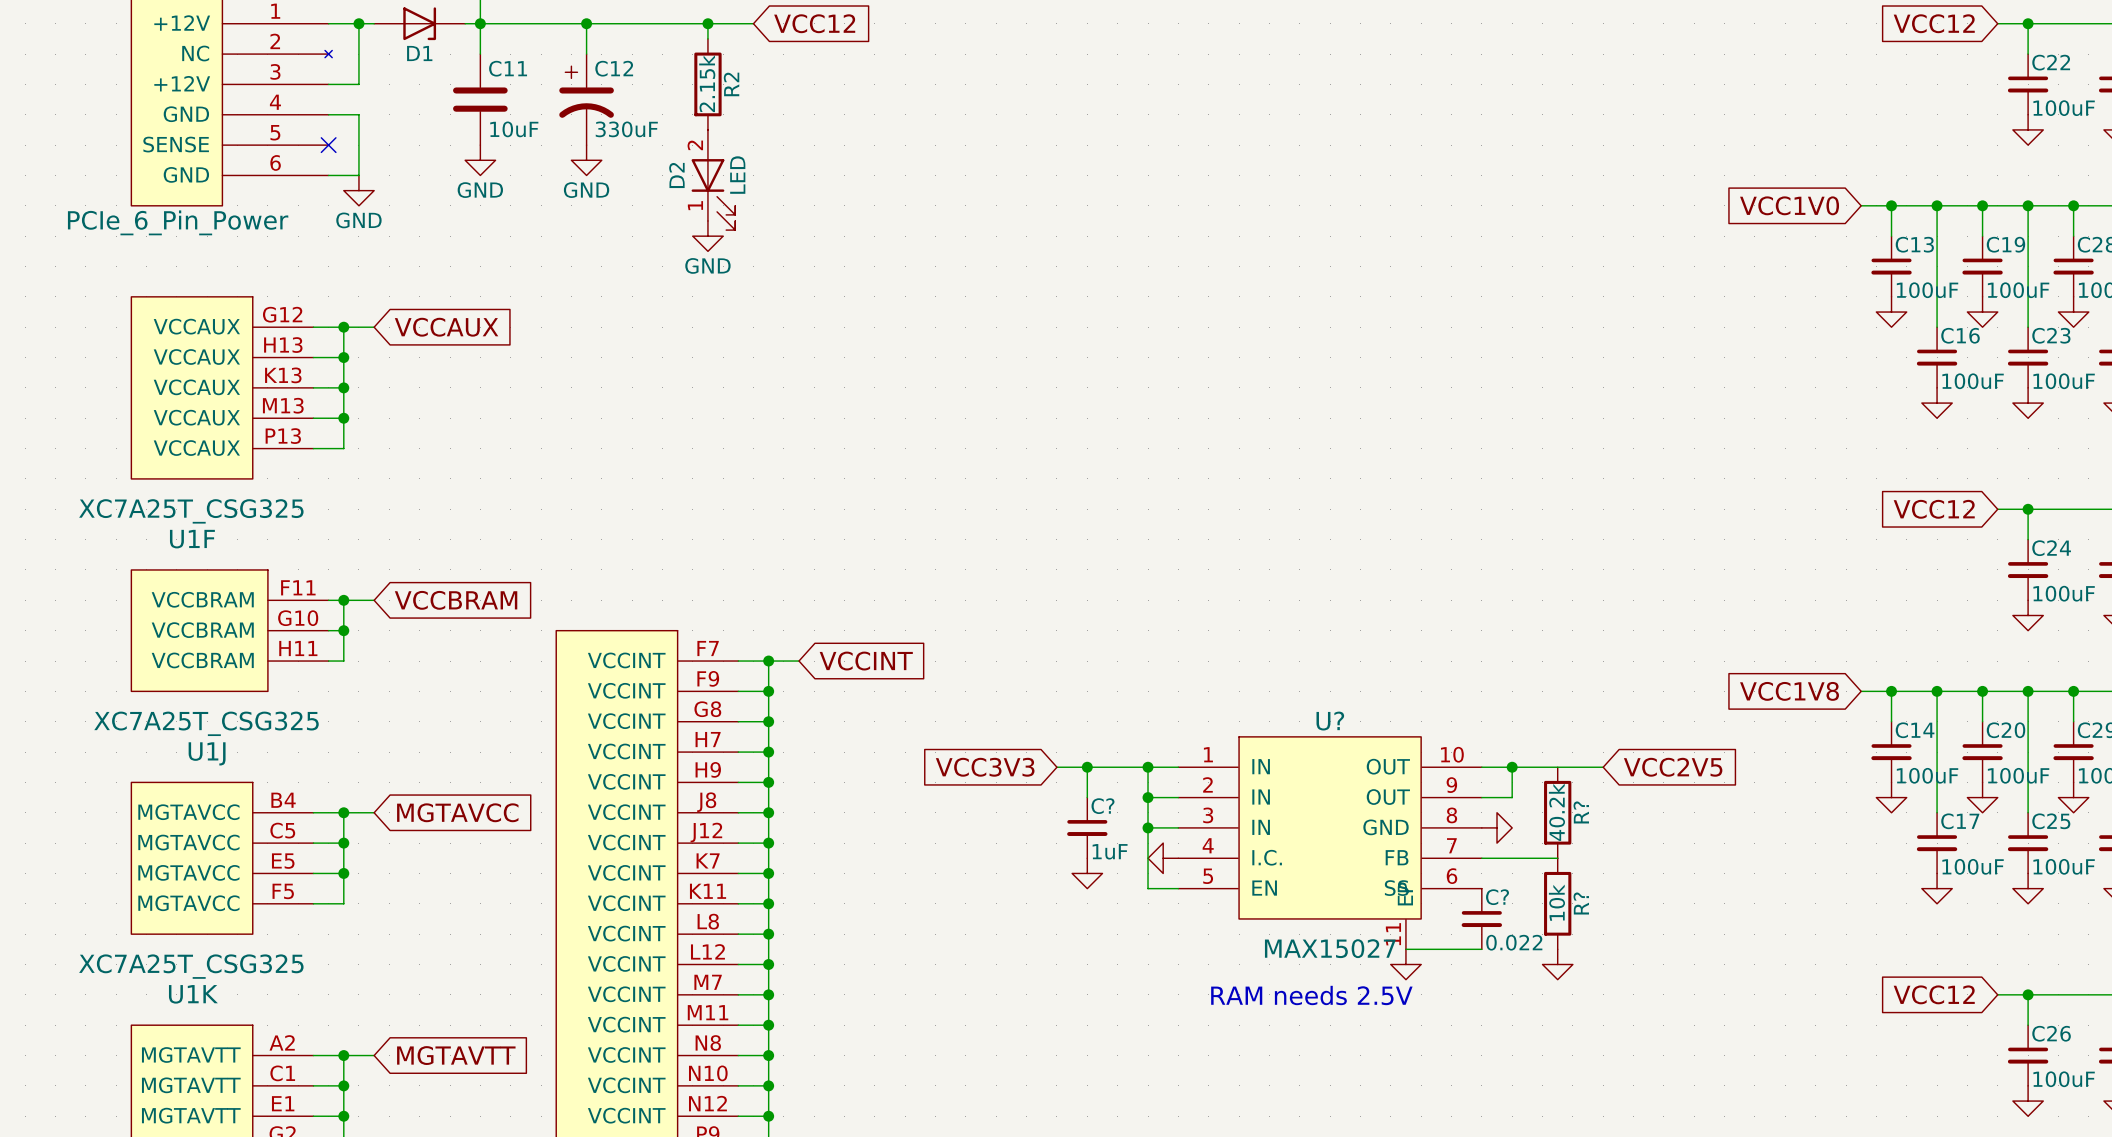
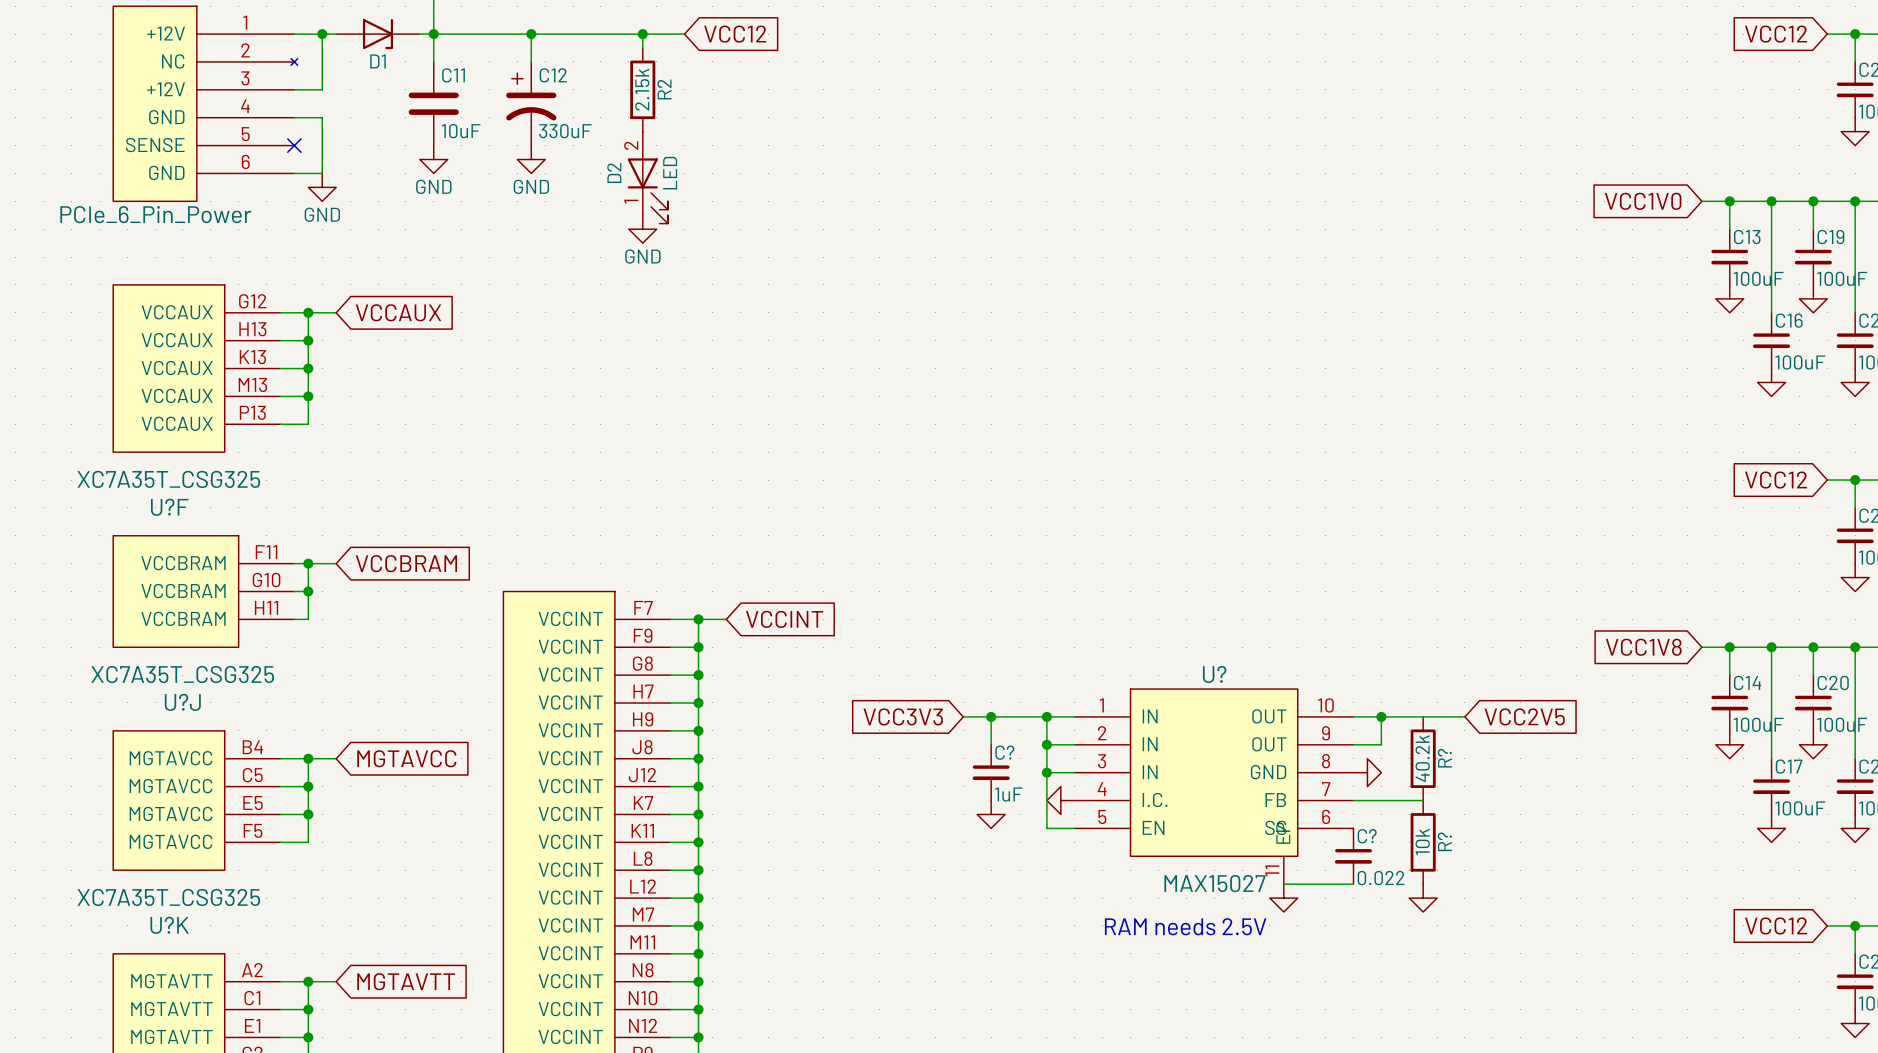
U1F value: XC7A25T_CSG325 (191, 511) -> XC7A35T_CSG325 (168, 479)
U1F name: U1F (192, 539) -> U?F (169, 507)
U1J value: XC7A25T_CSG325 (206, 723) -> XC7A35T_CSG325 (182, 674)
U1J name: U1J (207, 753) -> U?J (182, 702)
U1K value: XC7A25T_CSG325 (191, 966) -> XC7A35T_CSG325 (168, 897)
U1K name: U1K (193, 994) -> U?K (169, 925)

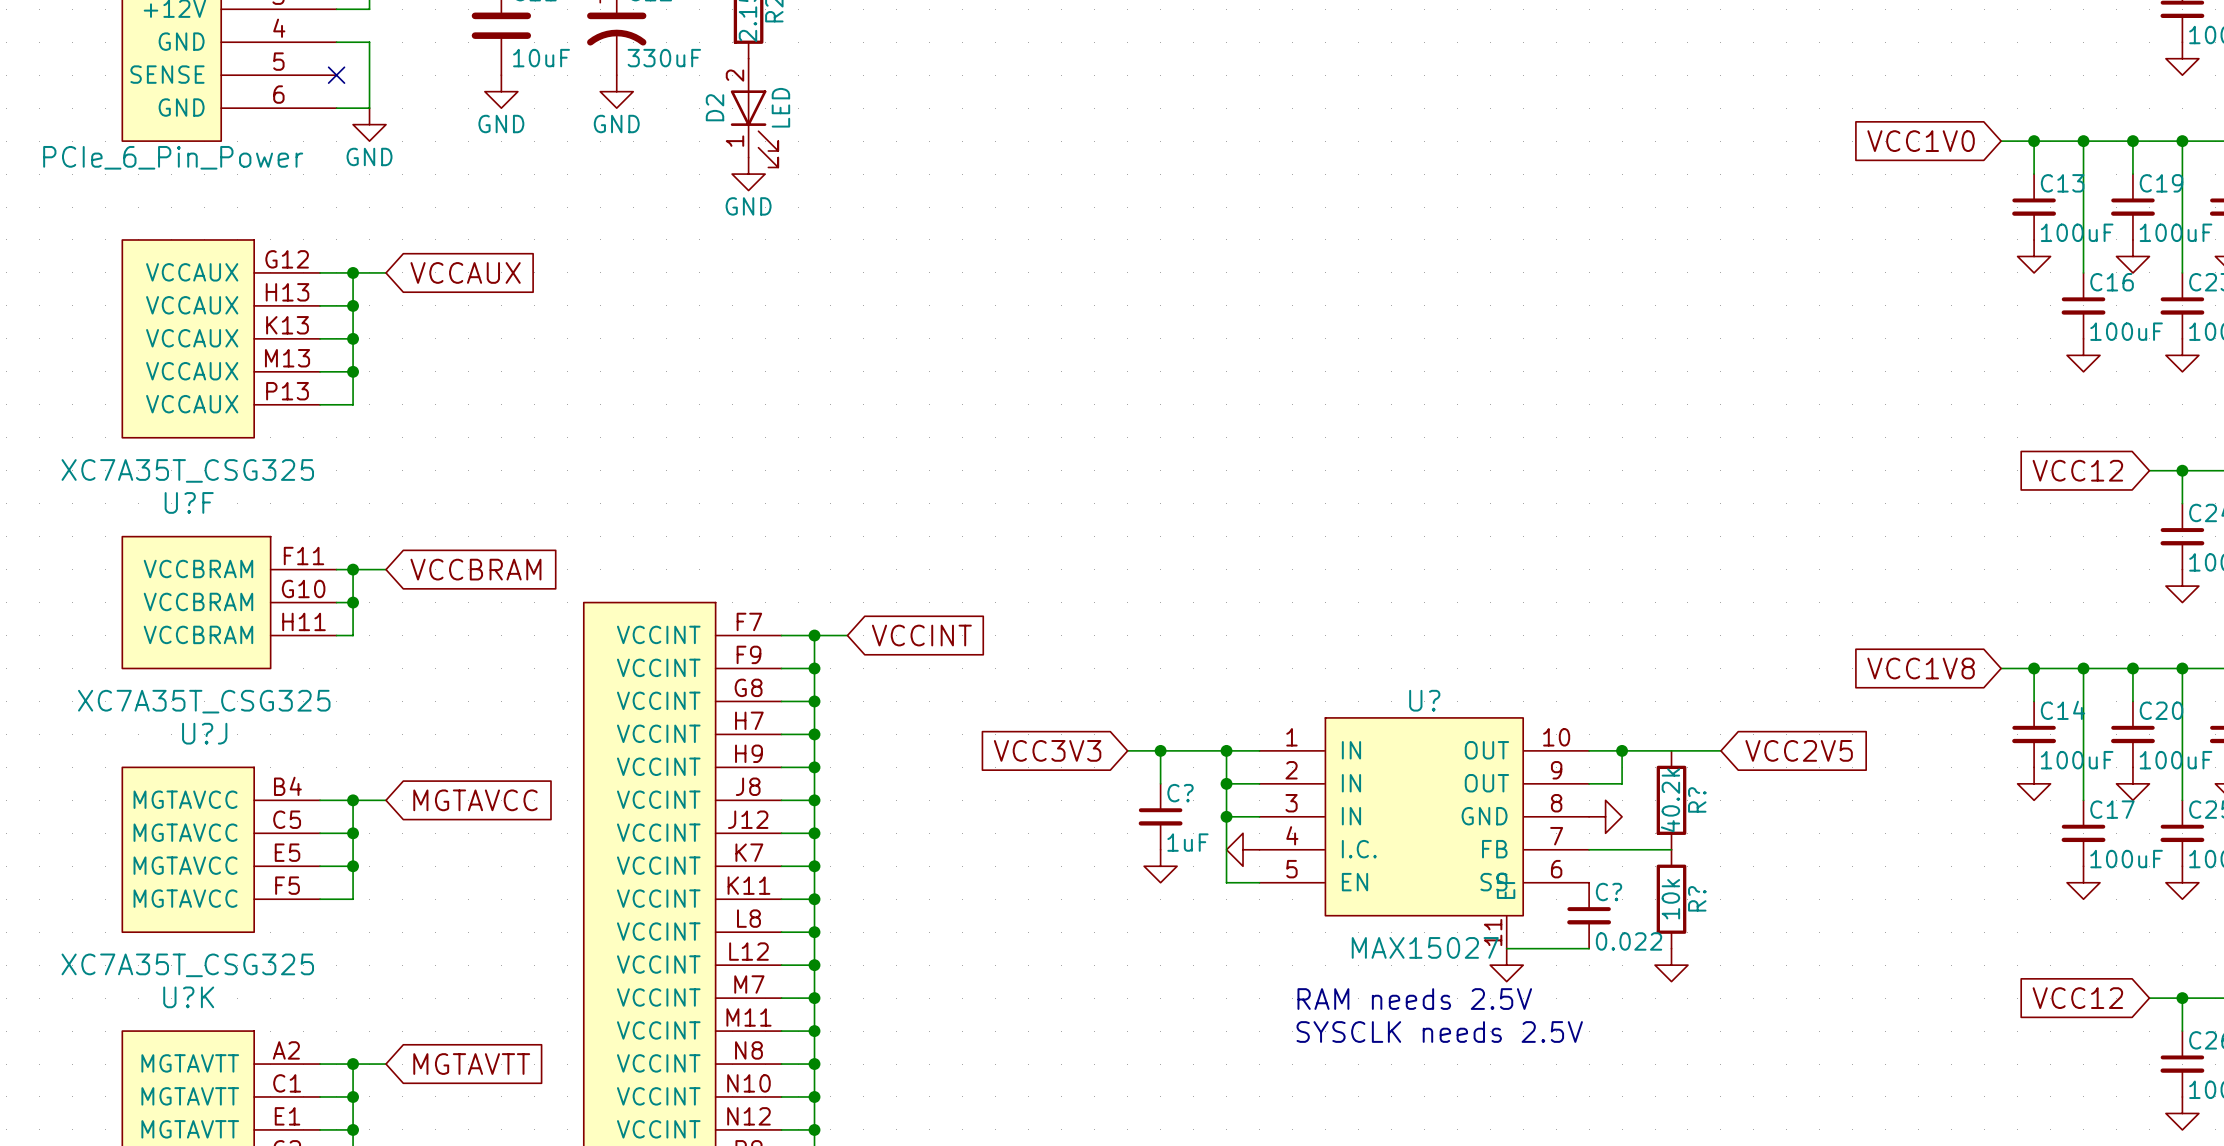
text: none -> SYSCLK needs 2.5V (1439, 1031)

